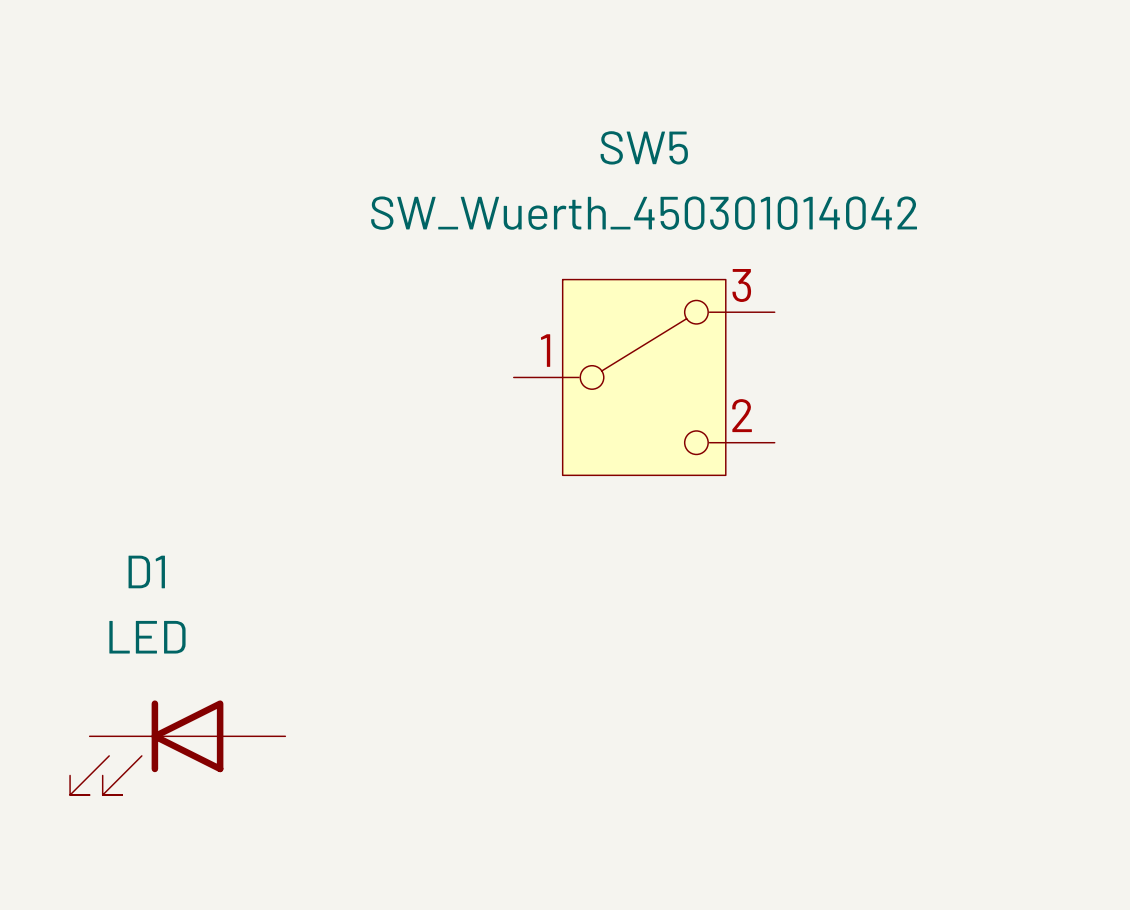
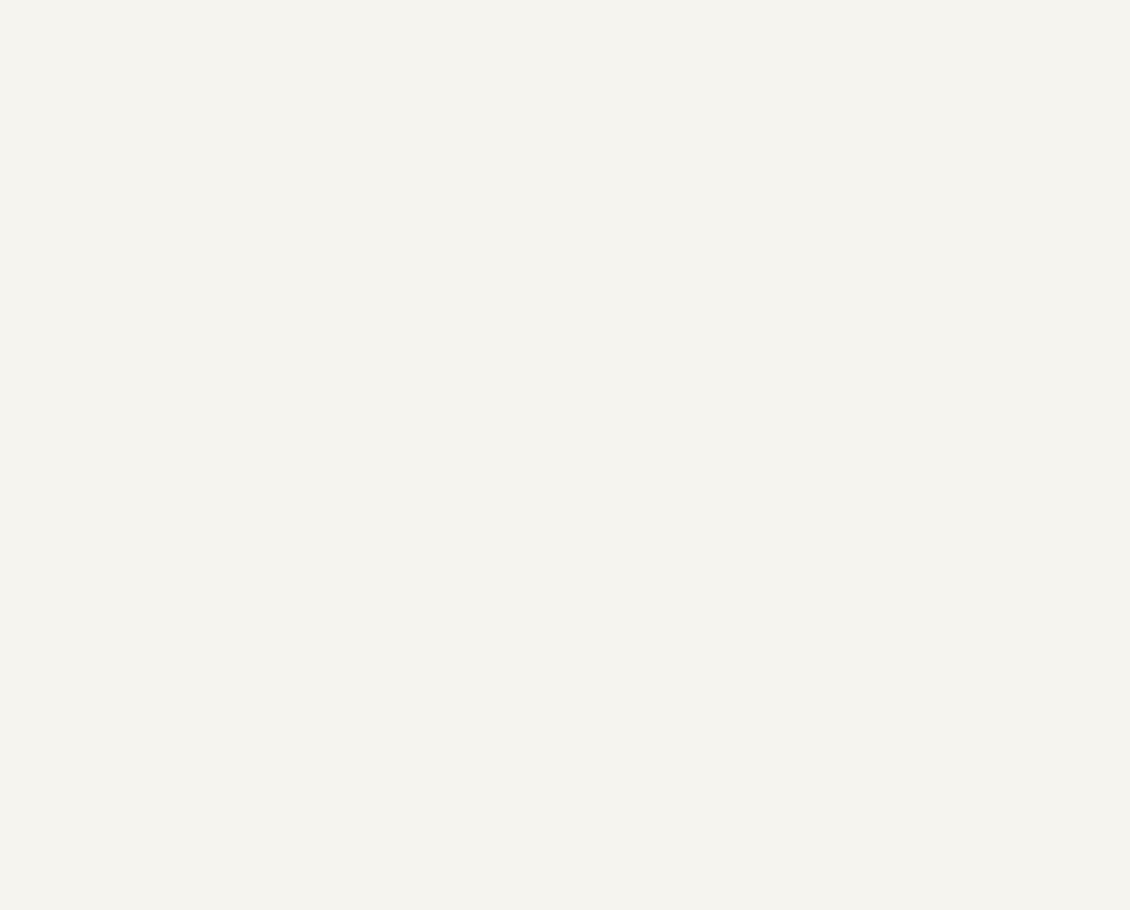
SW5: SW_Wuerth_450301014042 (644, 377) -> none
D1: LED (177, 747) -> none

